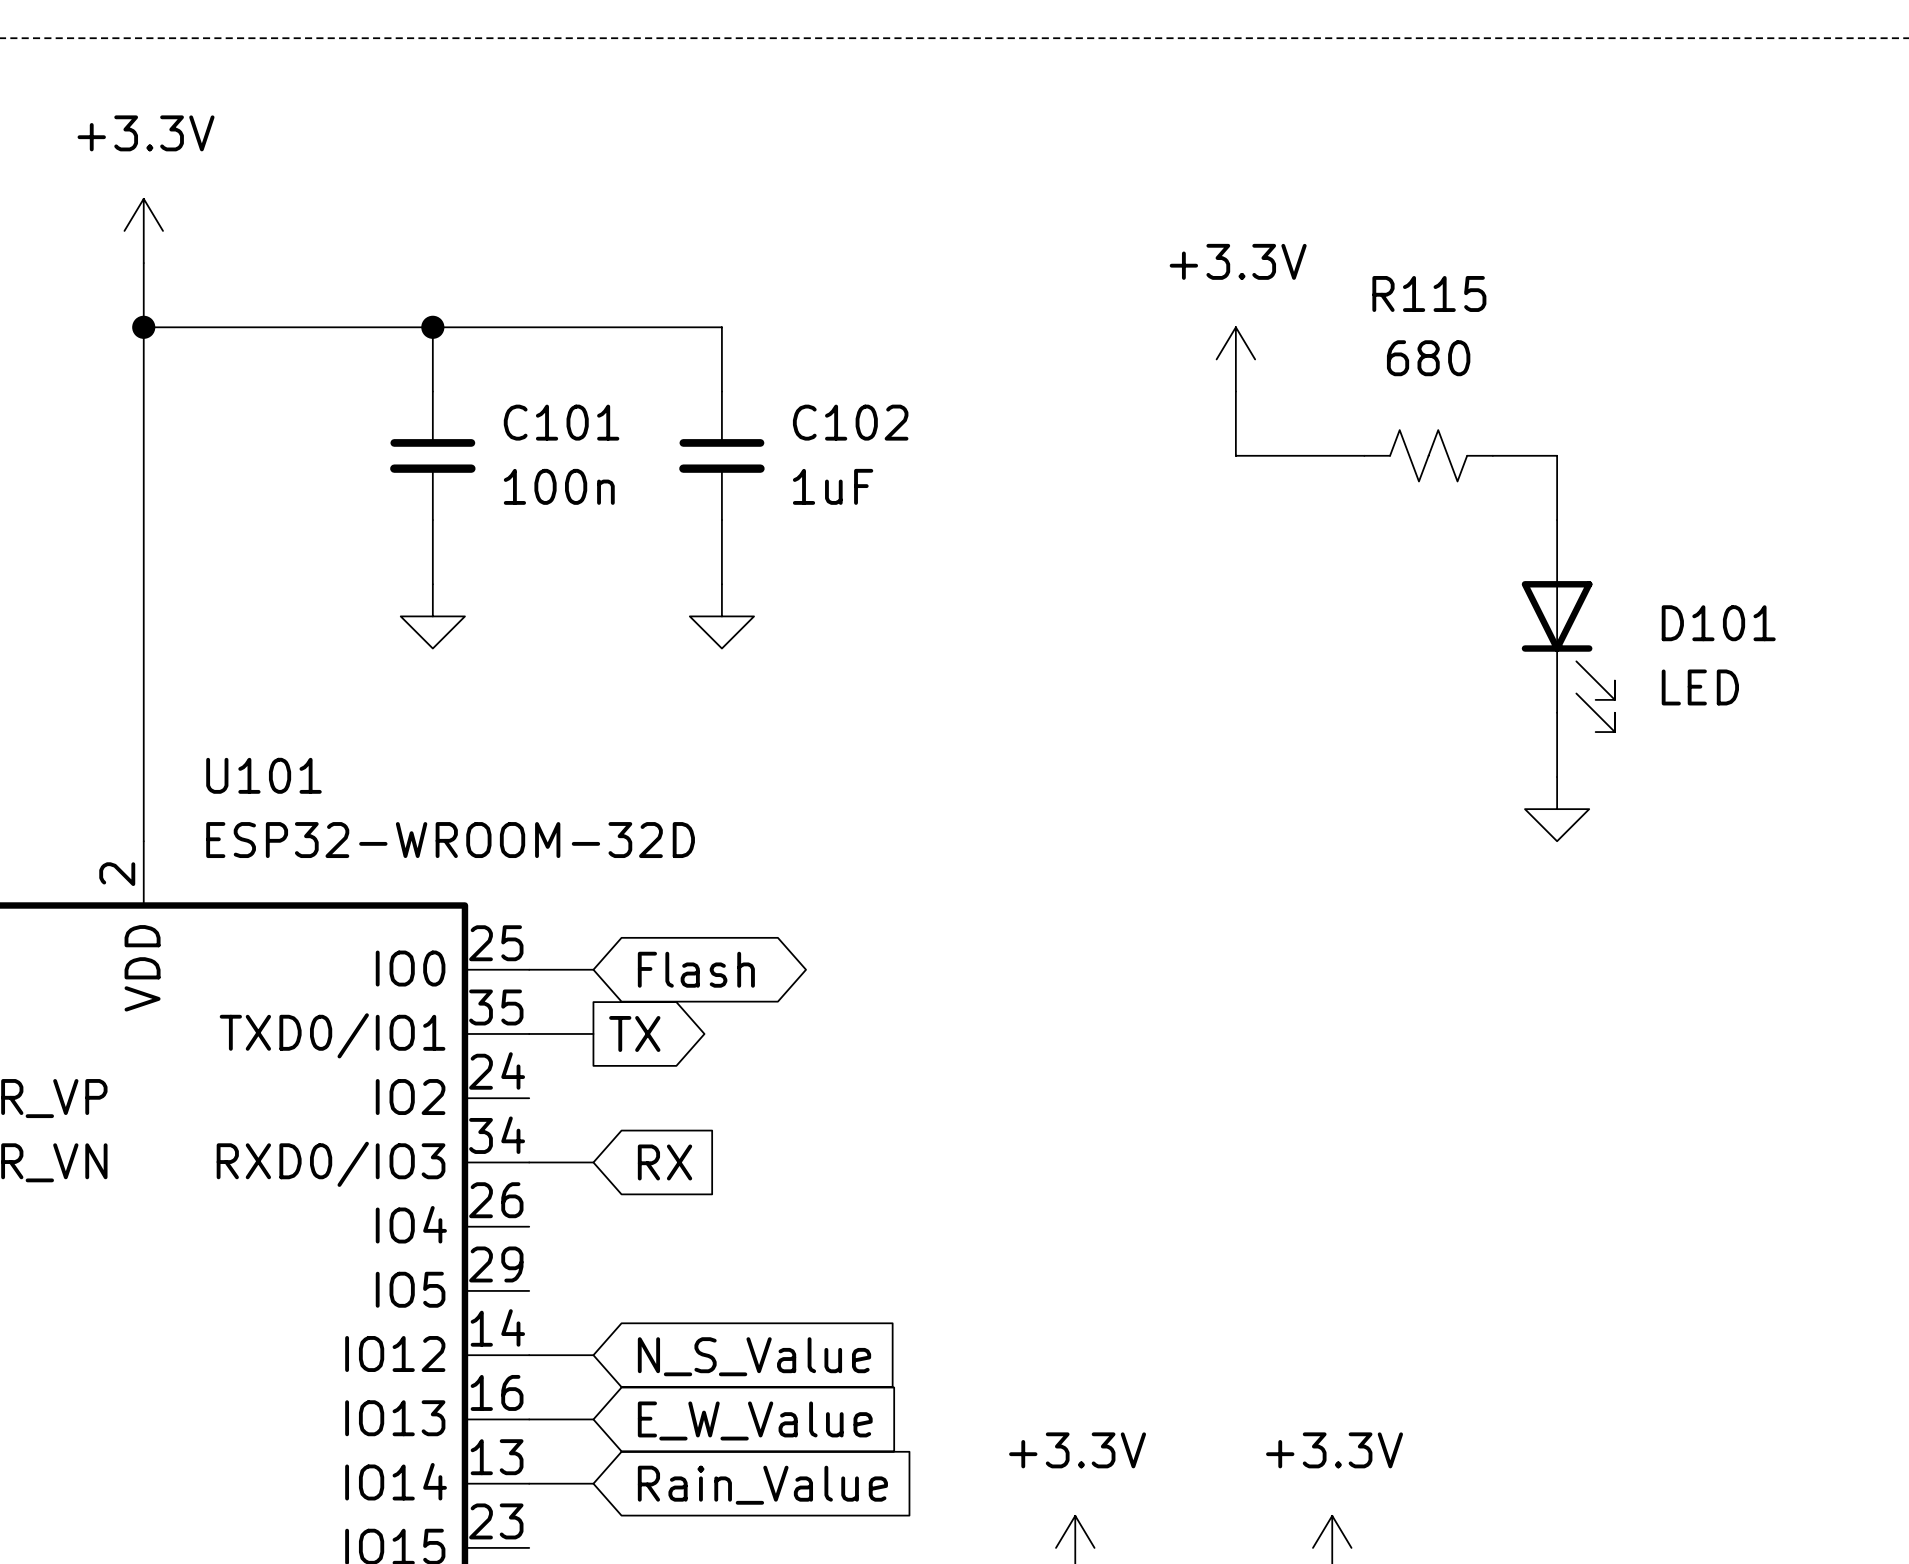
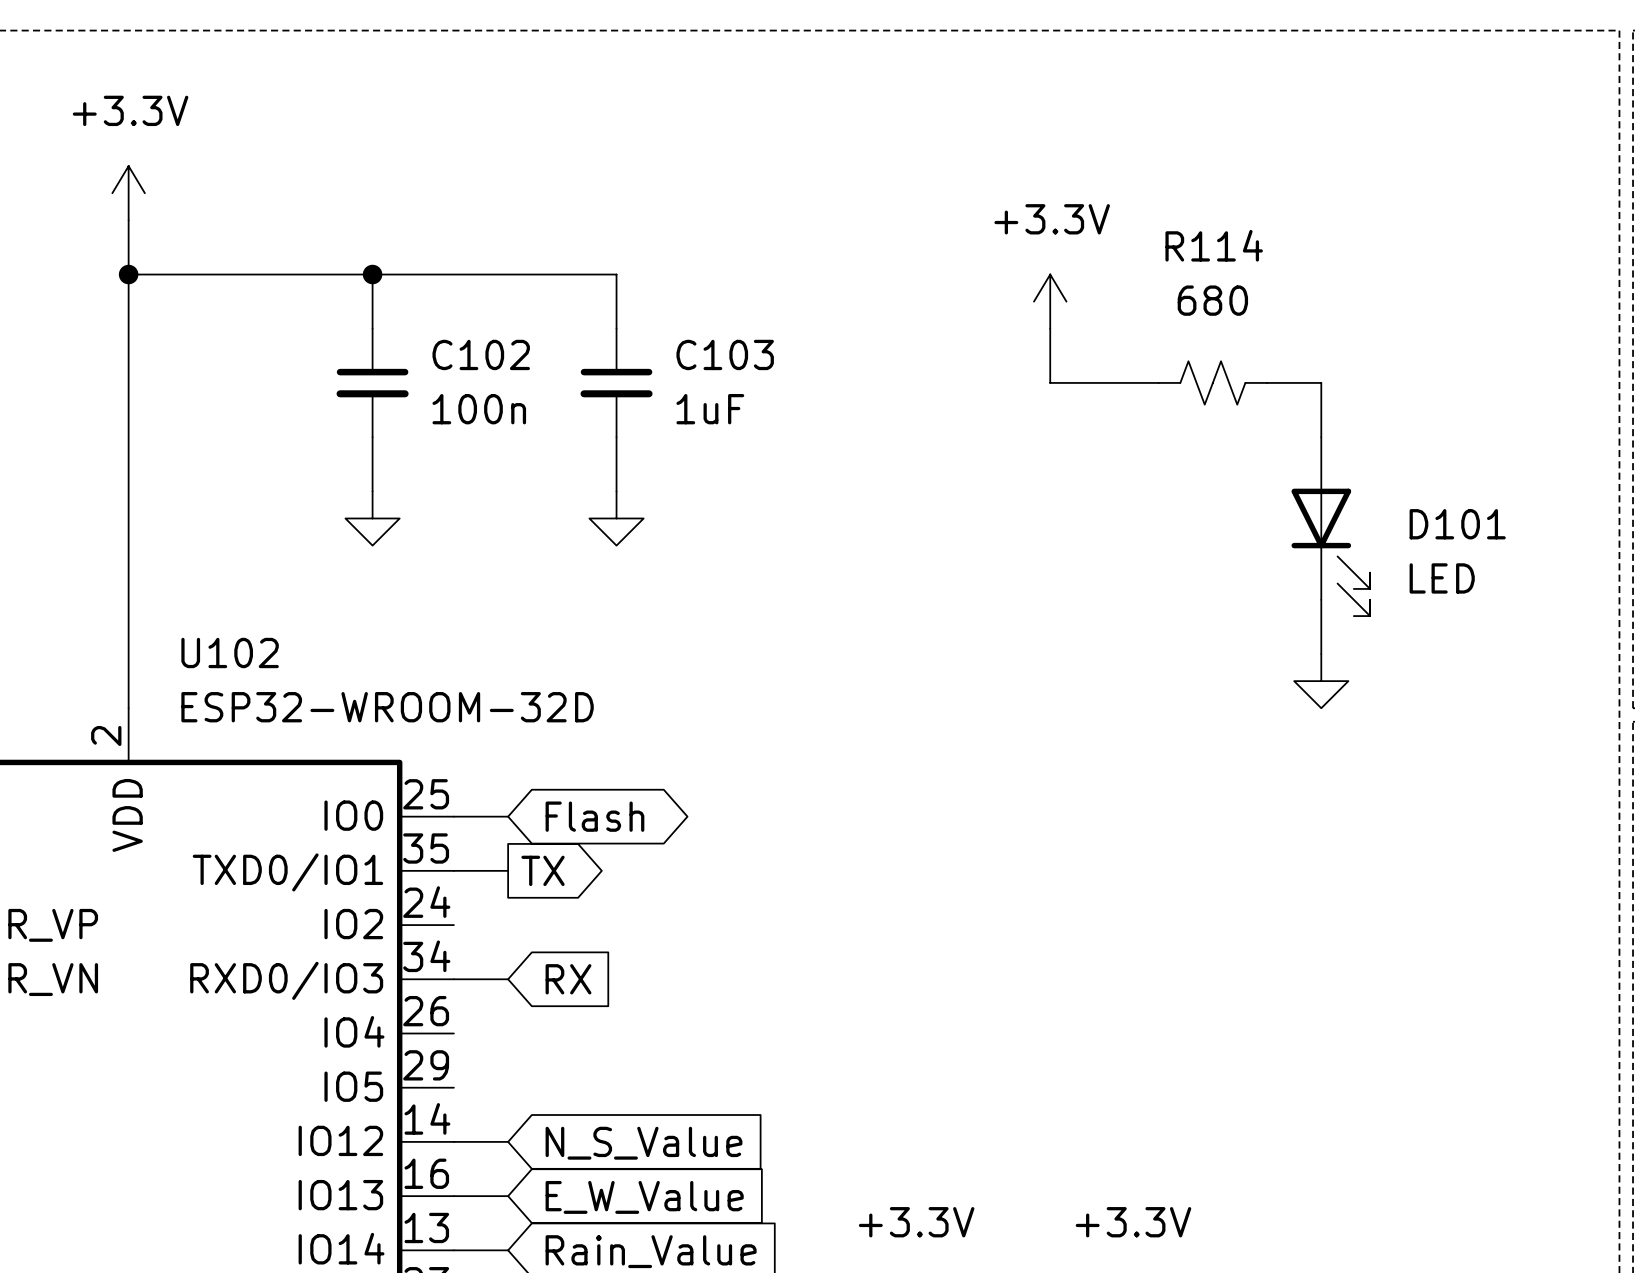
R115 name: R115 (1429, 293) -> R114 (1214, 245)
C101 name: C101 (561, 422) -> C102 (481, 354)
C102 name: C102 (850, 422) -> C103 (725, 354)
U101 name: U101 (263, 775) -> U102 (230, 653)

